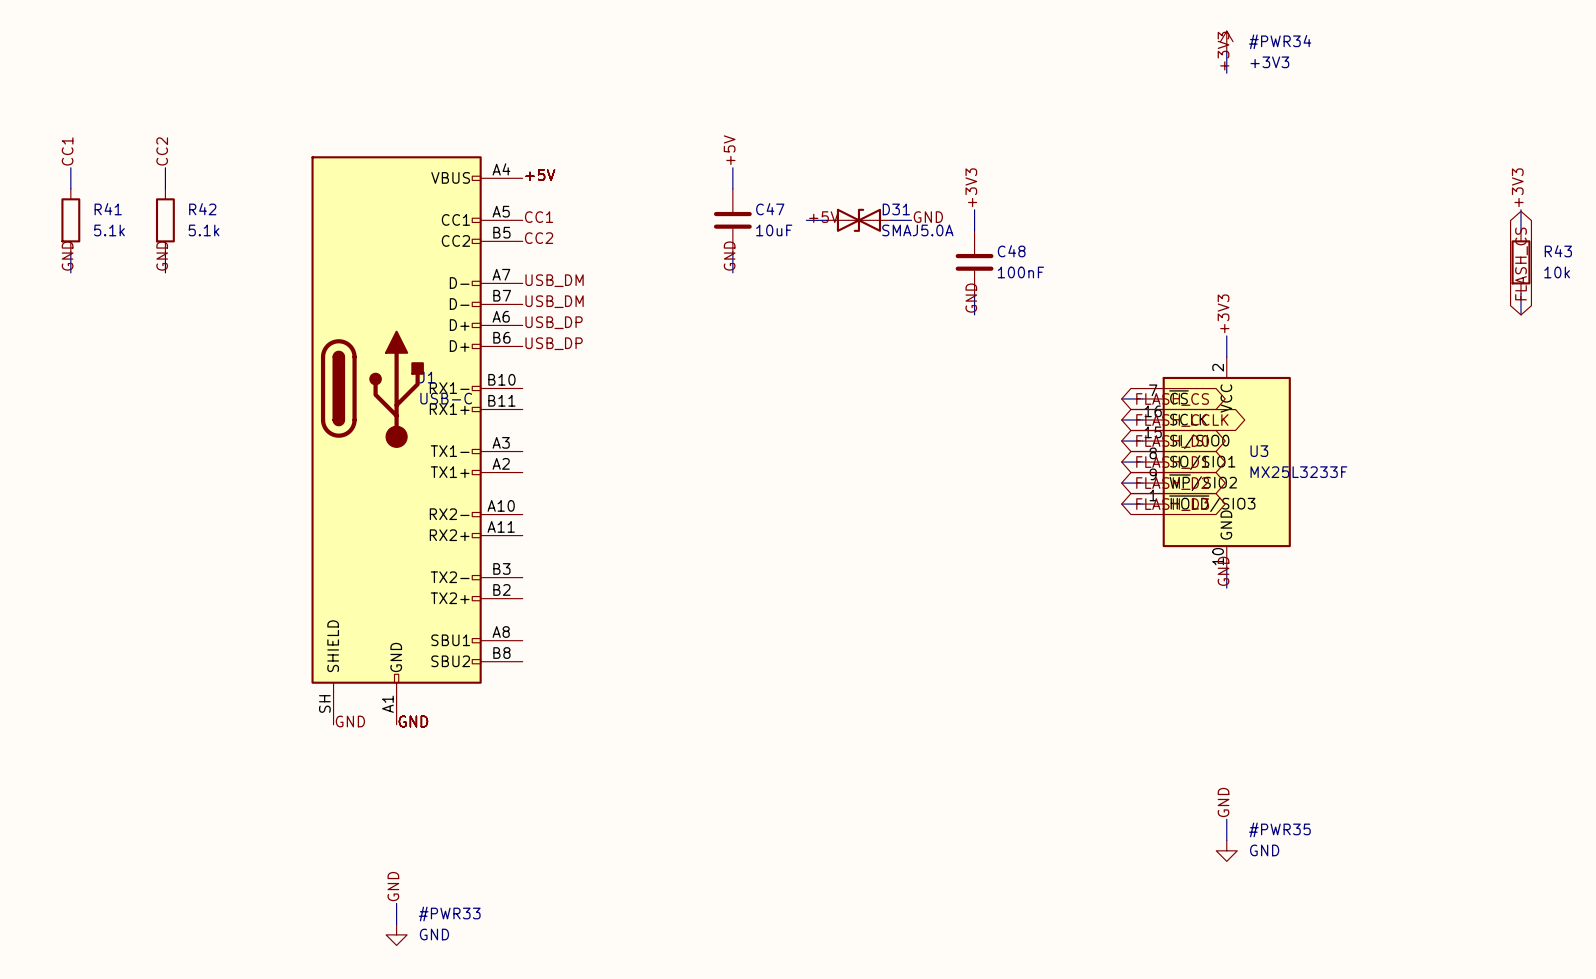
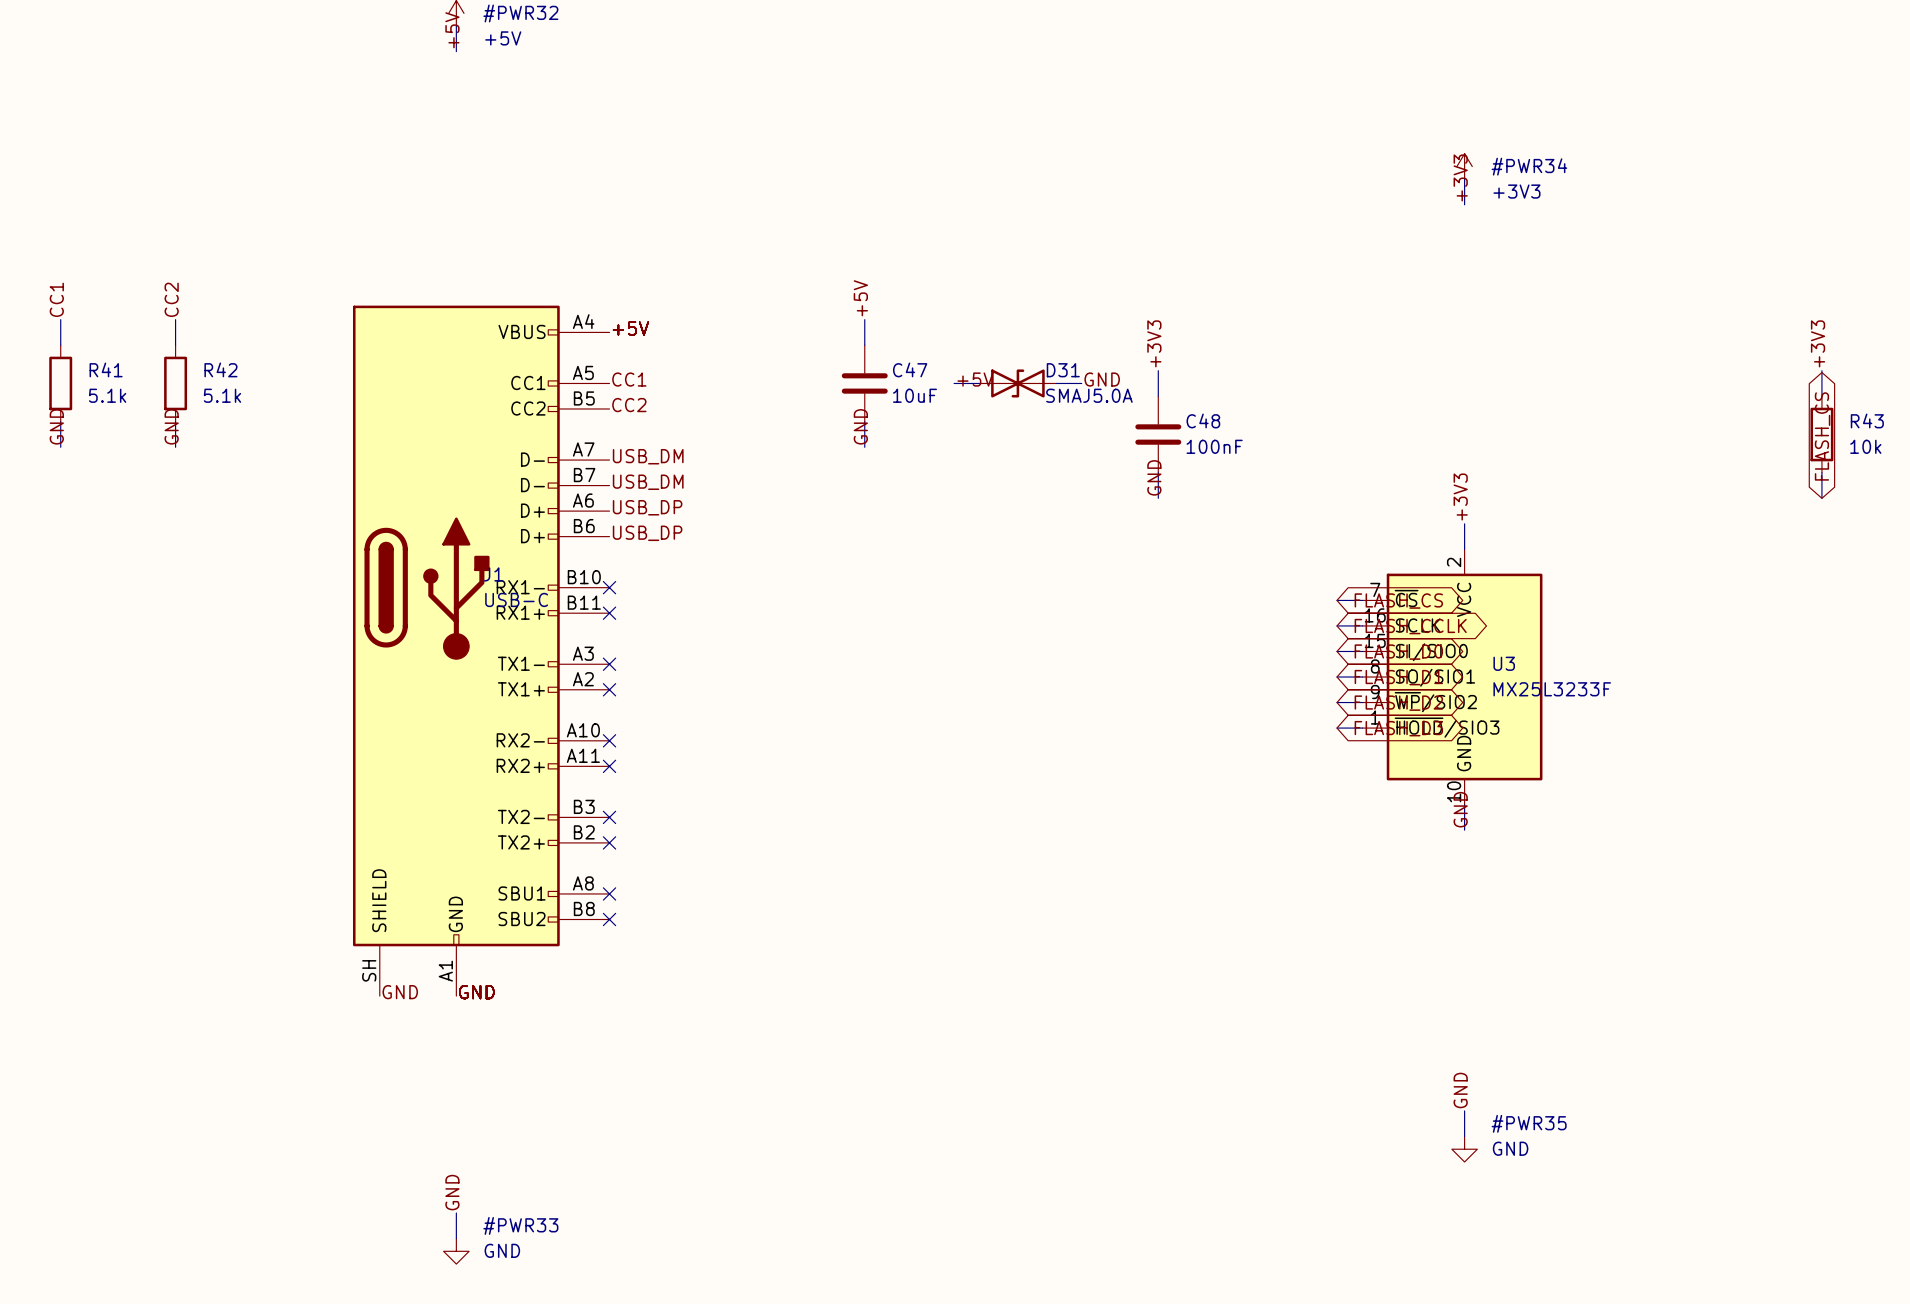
no-connect mark: none -> (609, 587)
no-connect mark: none -> (609, 613)
no-connect mark: none -> (609, 664)
no-connect mark: none -> (609, 689)
no-connect mark: none -> (609, 740)
no-connect mark: none -> (609, 766)
no-connect mark: none -> (609, 817)
no-connect mark: none -> (609, 842)
no-connect mark: none -> (609, 893)
no-connect mark: none -> (609, 919)

